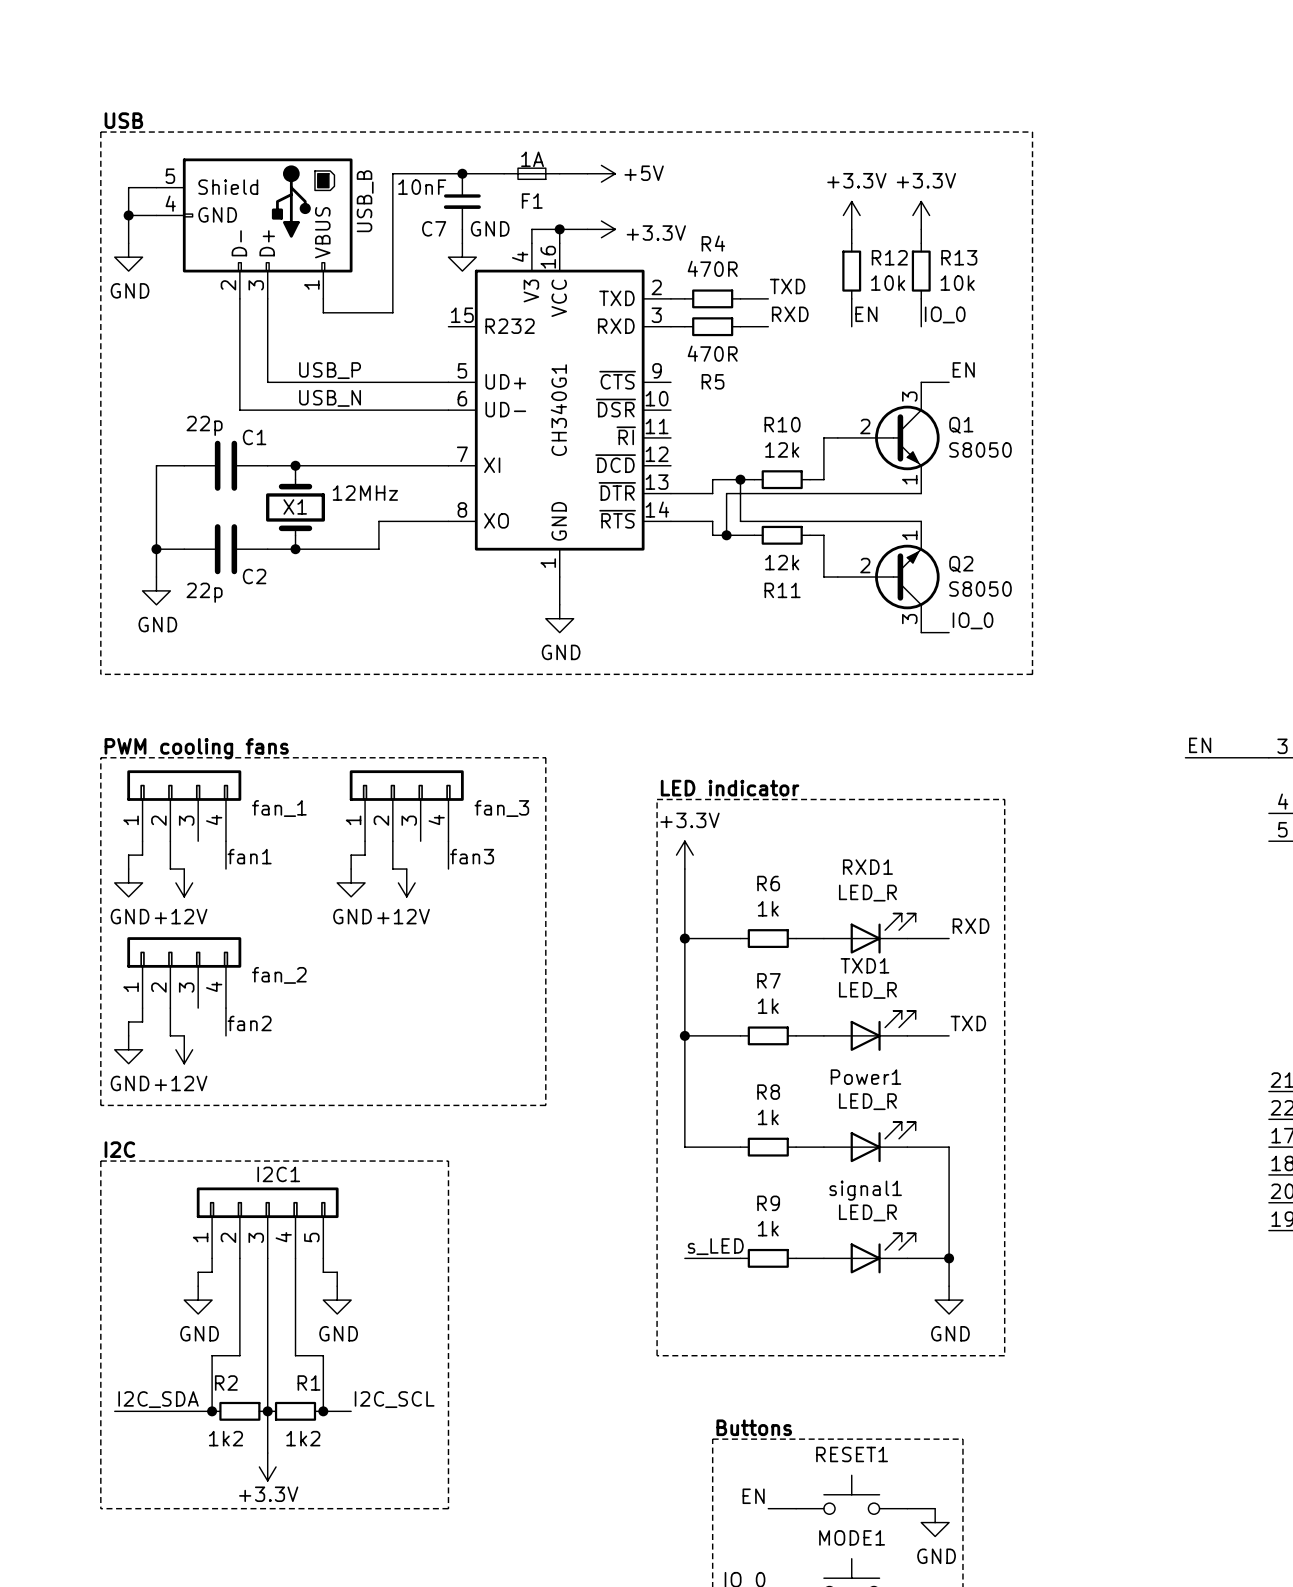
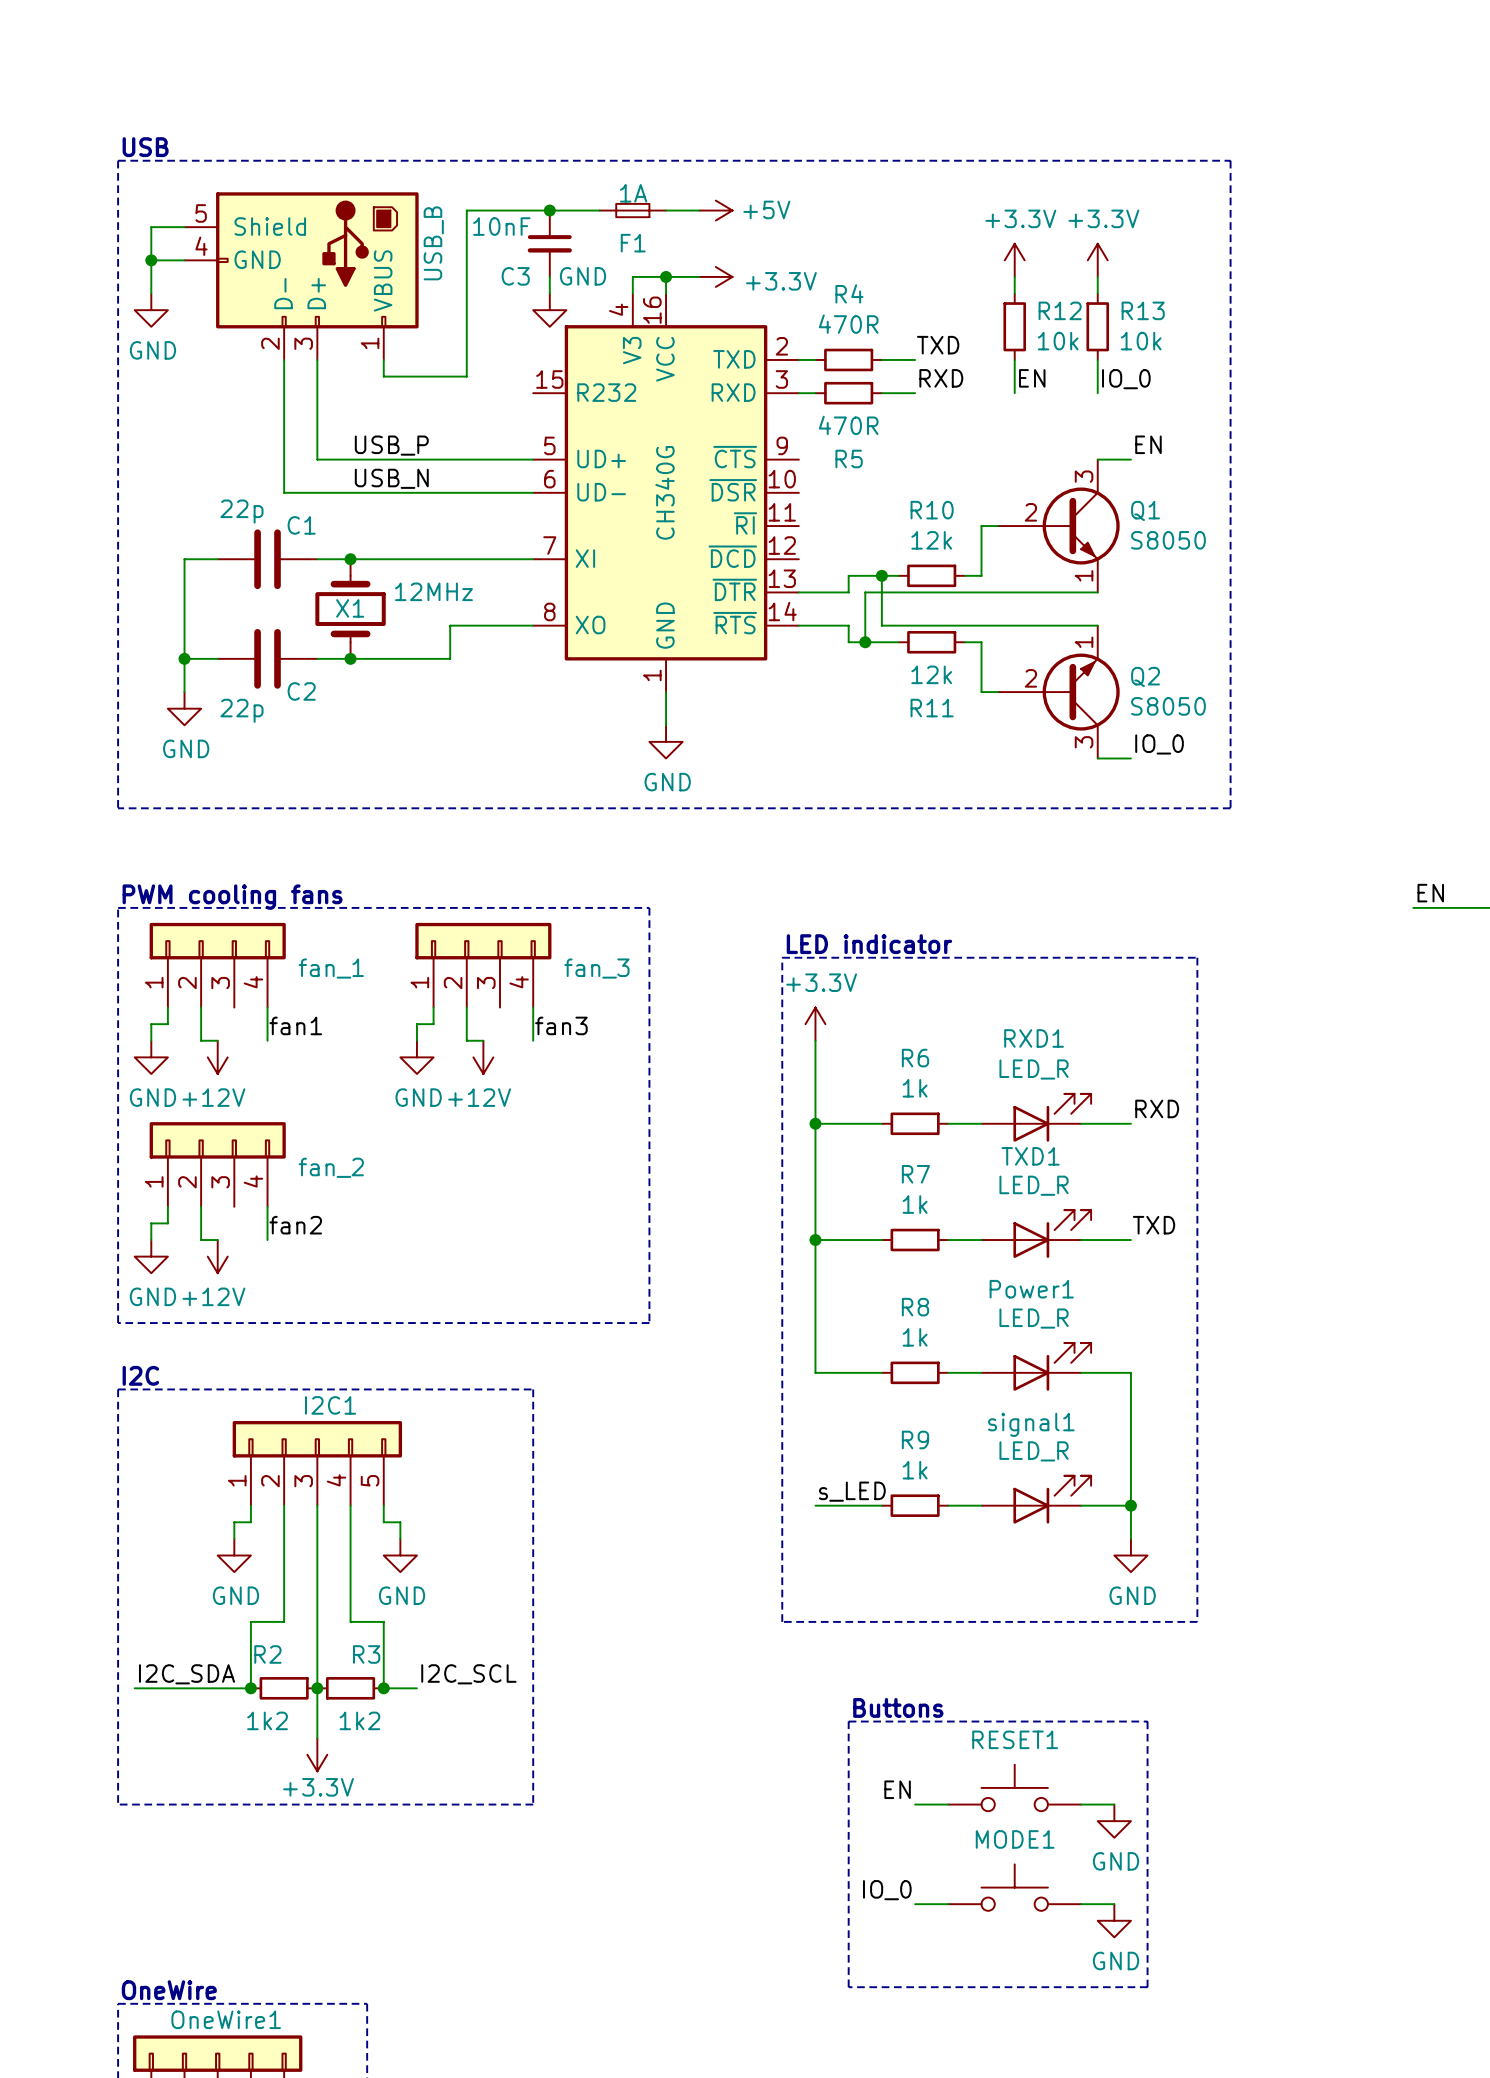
C7 name: C7 (434, 228) -> C3 (515, 276)
CH340G1 name: CH340G1 (558, 410) -> CH340G (665, 492)
R1 name: R1 (308, 1383) -> R3 (366, 1654)

